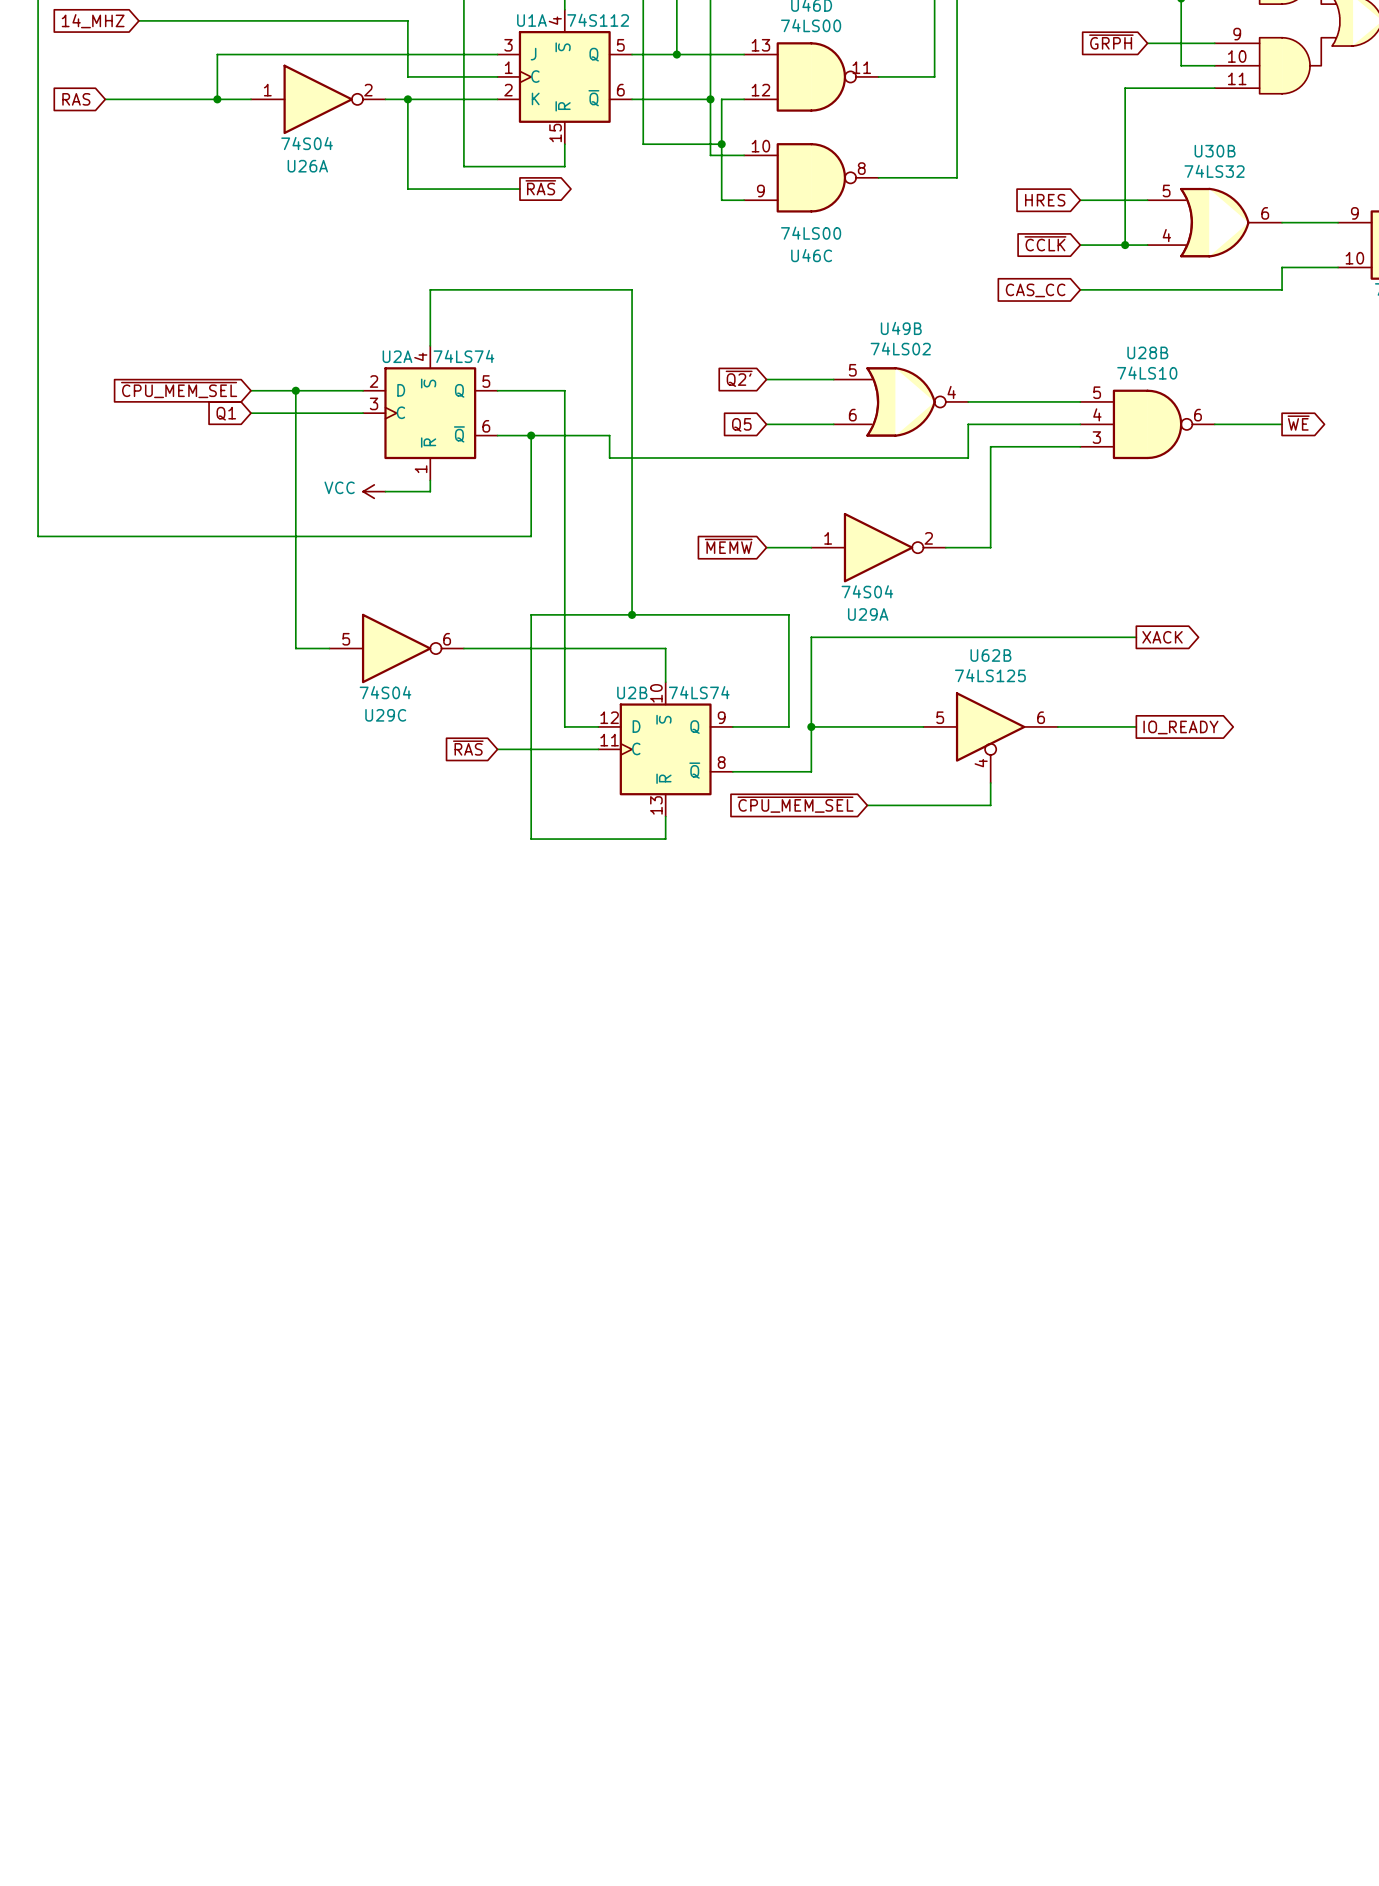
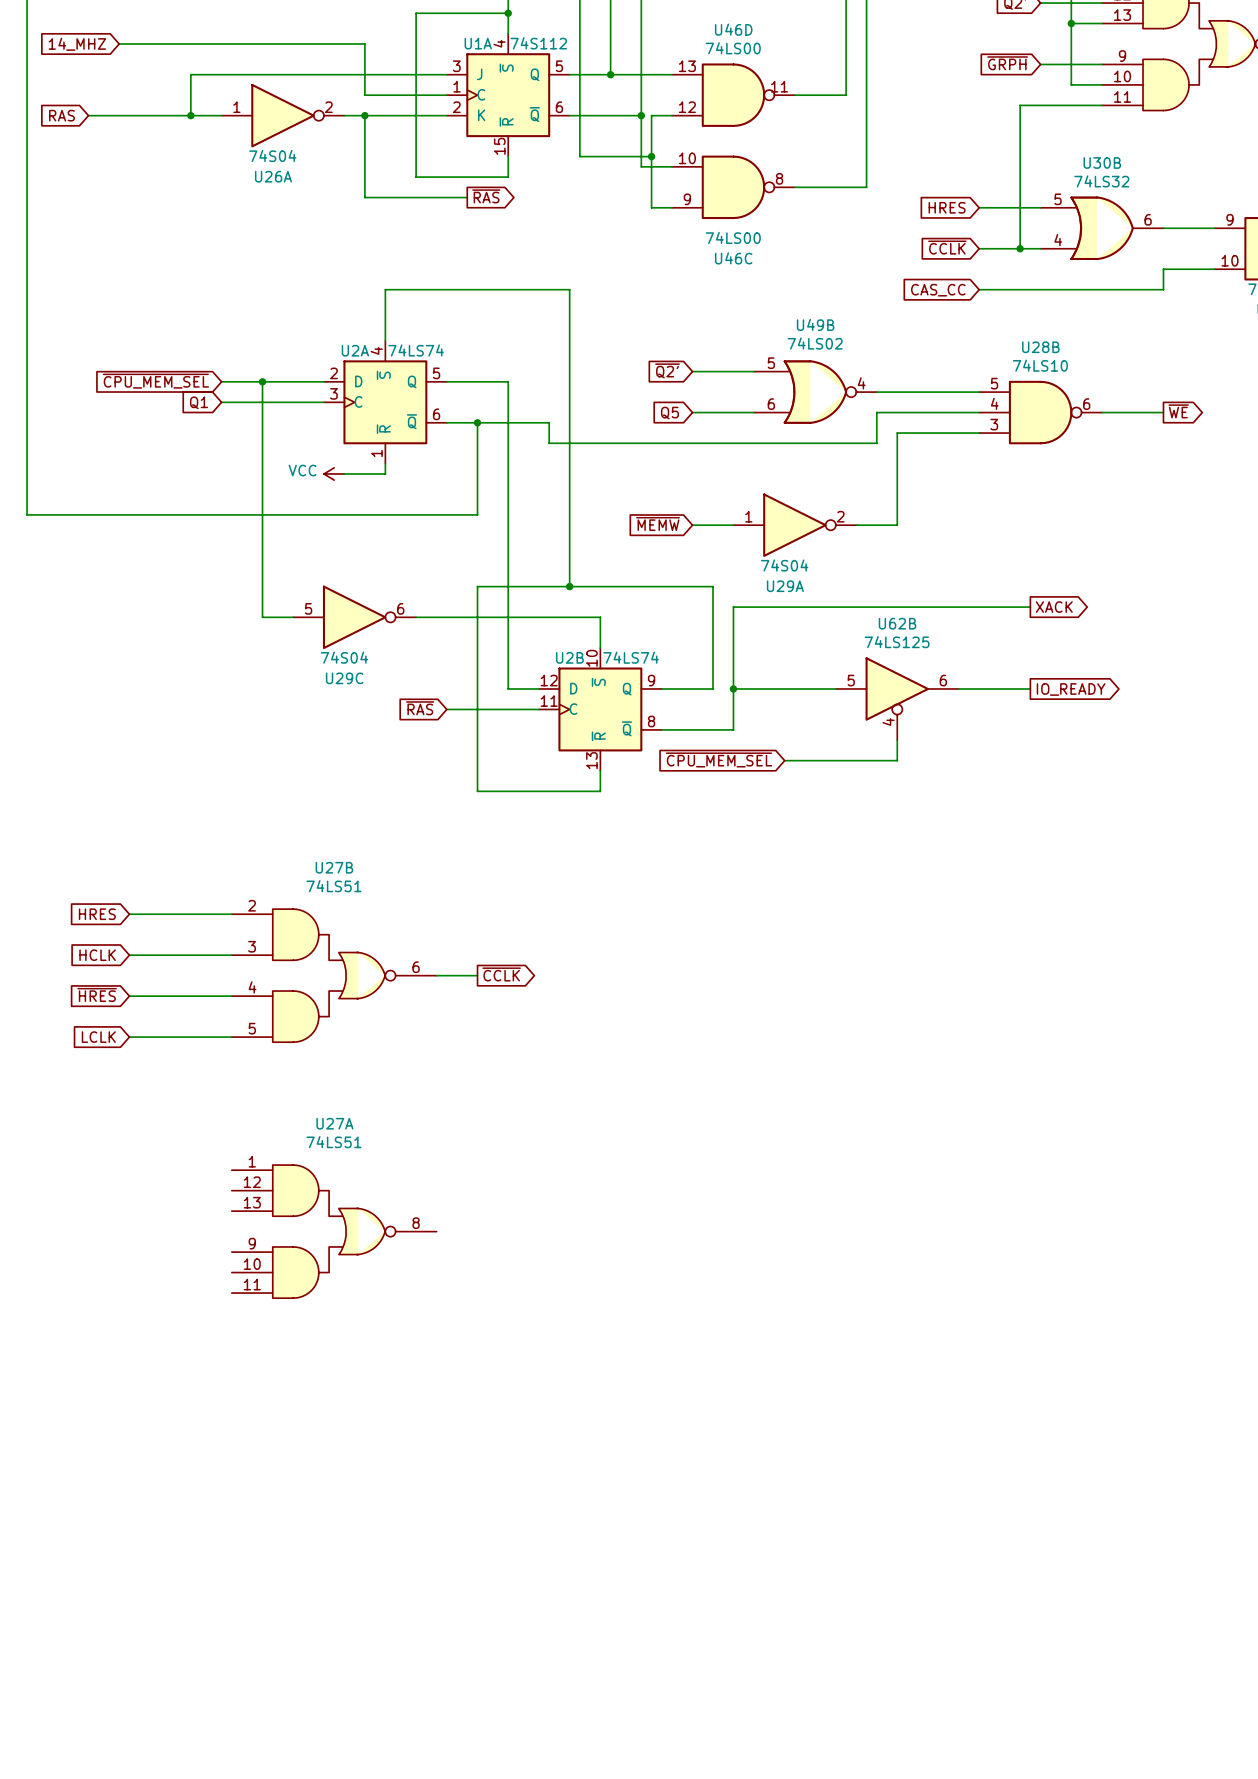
global label: none -> HRES (97, 914)
wire: none -> (129, 914) (231, 914)
global label: none -> HCLK (97, 955)
wire: none -> (129, 955) (231, 955)
global label: none -> ~{CCLK} (501, 974)
U27B: none -> 74LS51 (334, 975)
wire: none -> (436, 975) (477, 975)
global label: none -> ~{HRES} (97, 994)
wire: none -> (129, 996) (231, 996)
global label: none -> LCLK (98, 1037)
wire: none -> (129, 1037) (231, 1037)
U27A: none -> 74LS51 (334, 1231)

